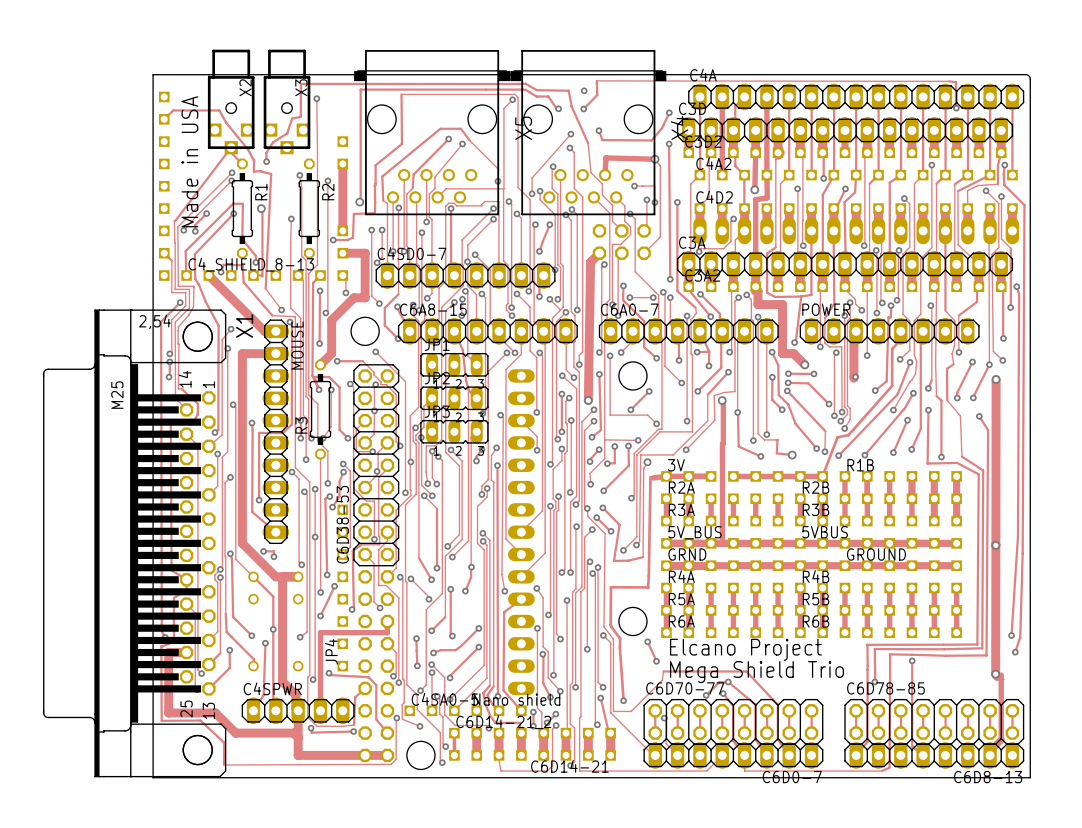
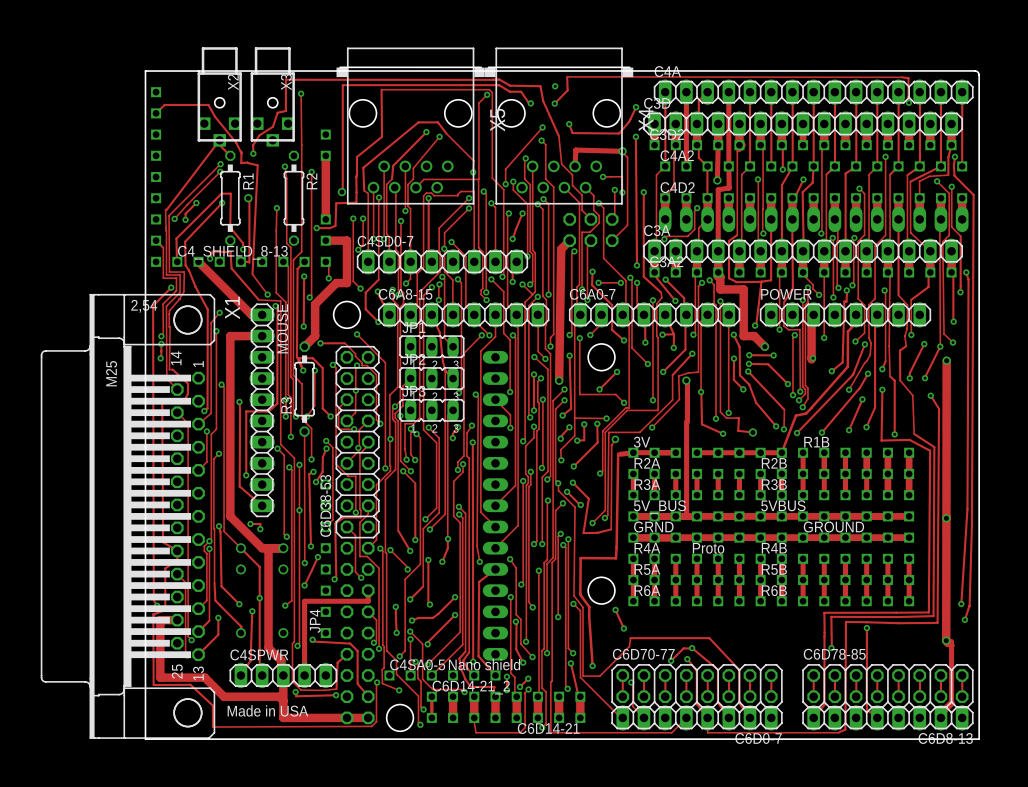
text: Made in USA (189, 161) -> none
R4A value: none -> Proto (708, 548)
text: Elcano Project (745, 649) -> none
text: Mega Shield Trio (757, 672) -> none
text: none -> Made in USA (267, 710)

